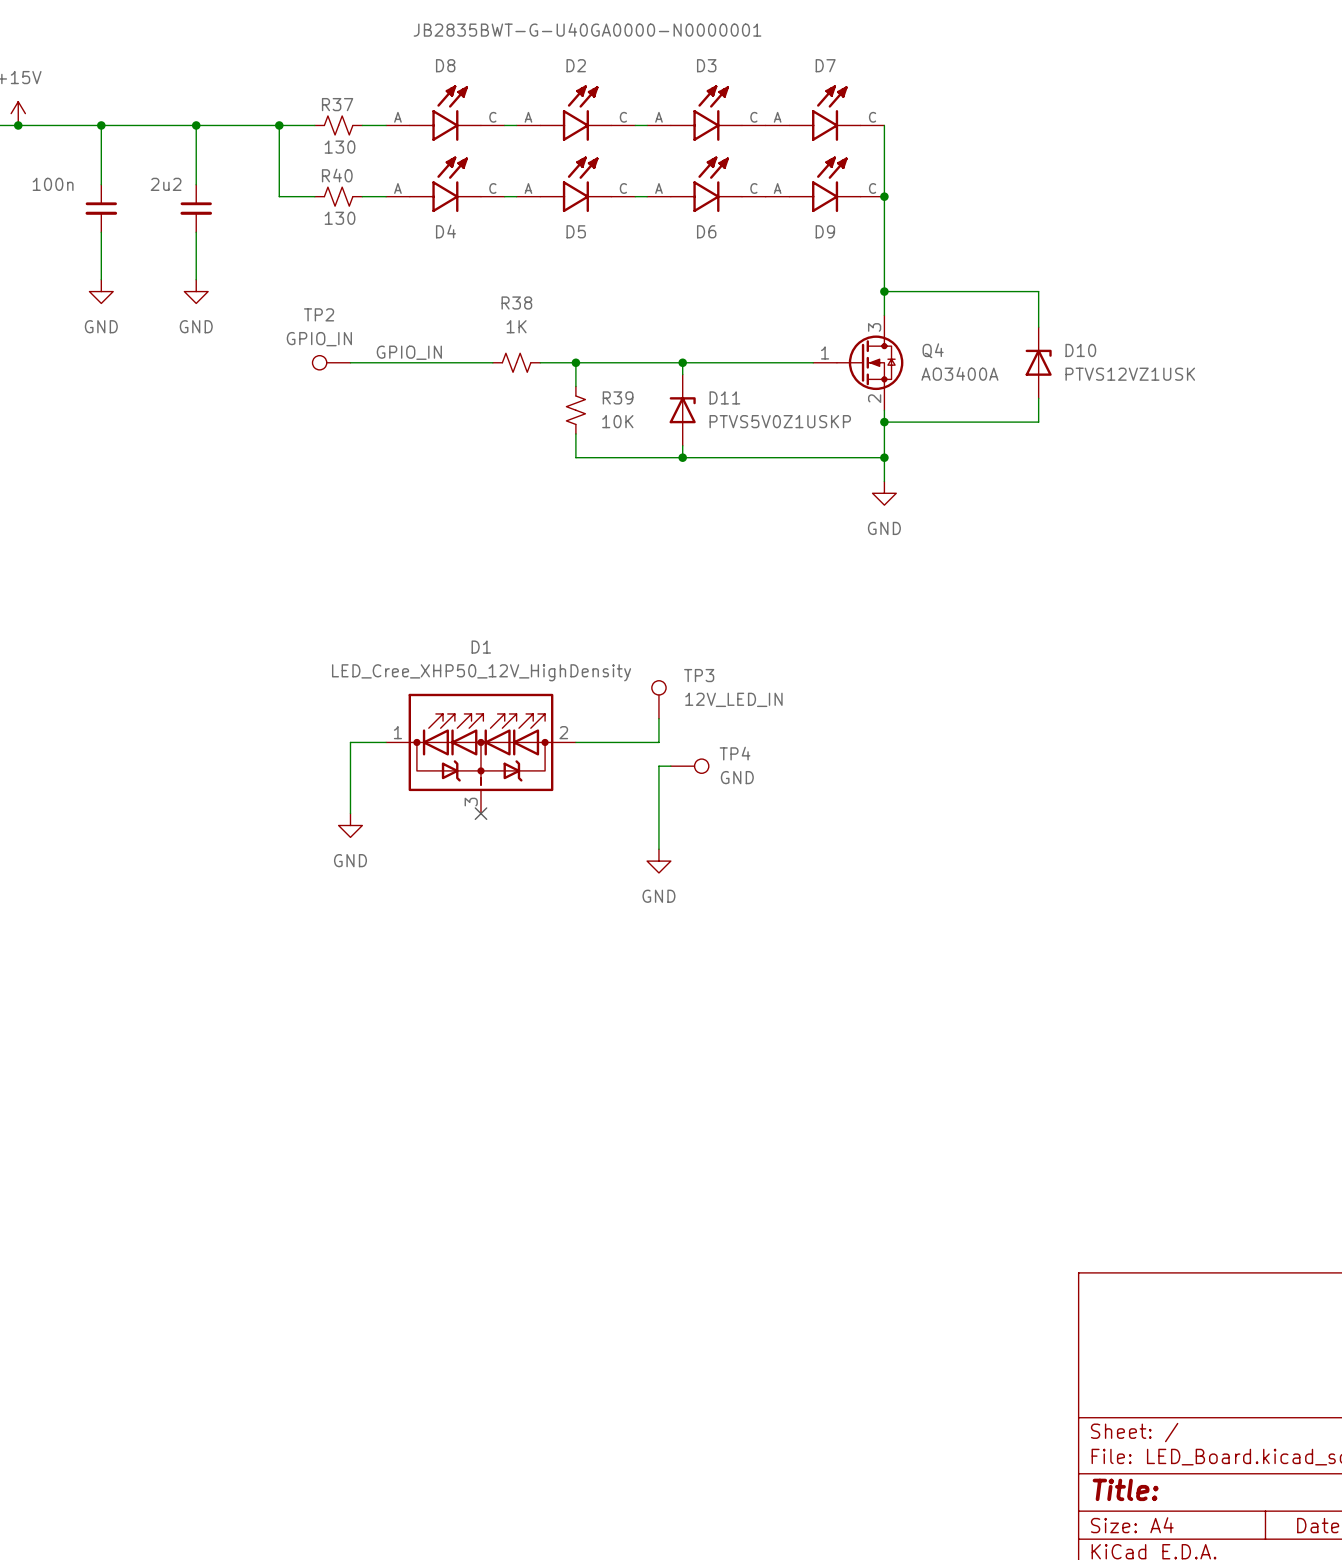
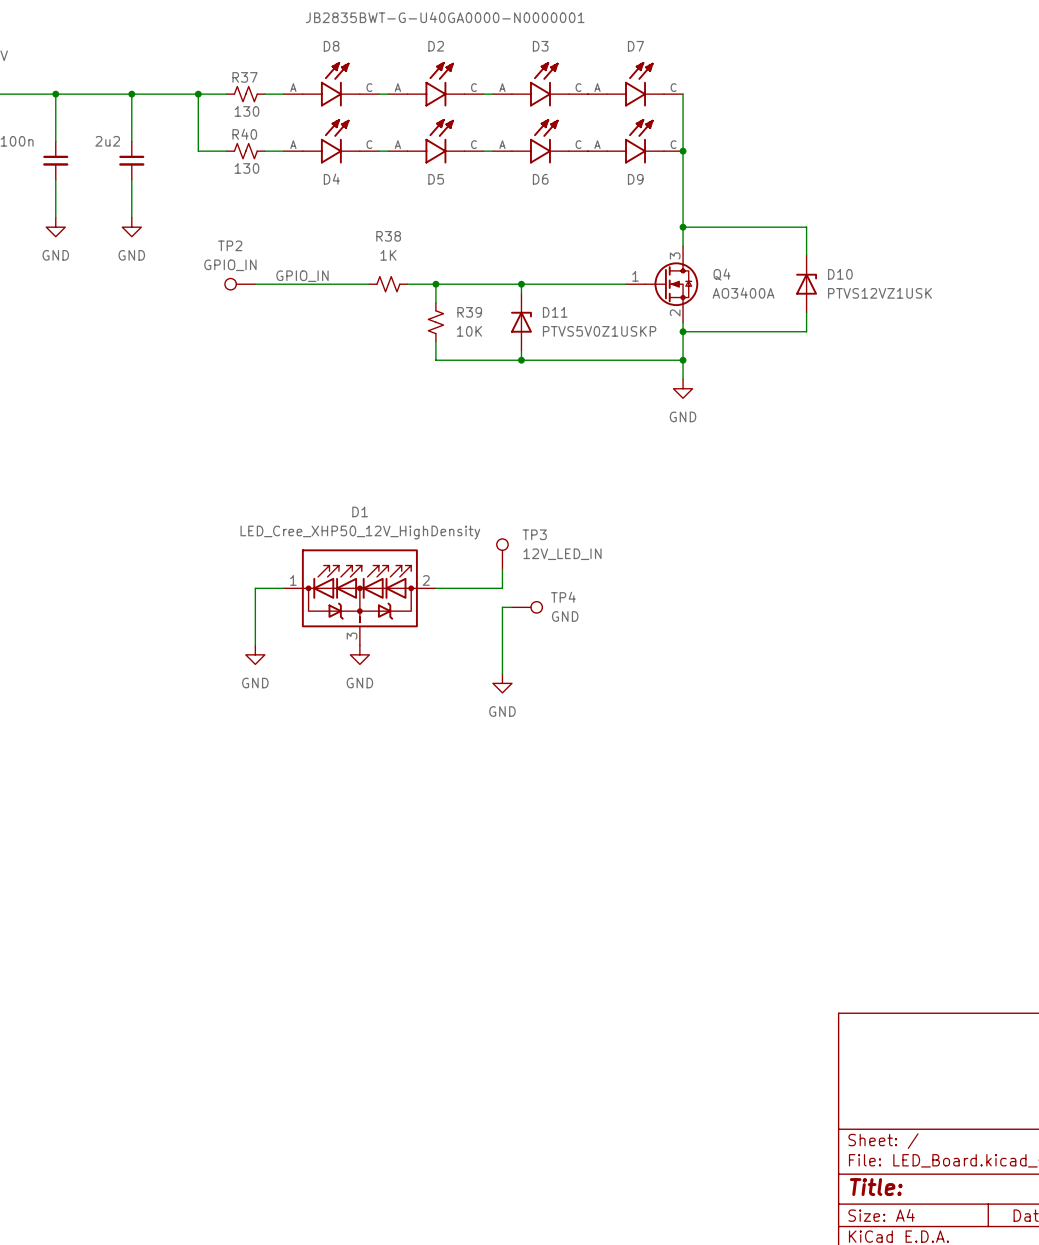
no-connect mark: (480, 813) -> none
power symbol: none -> GND (359, 654)

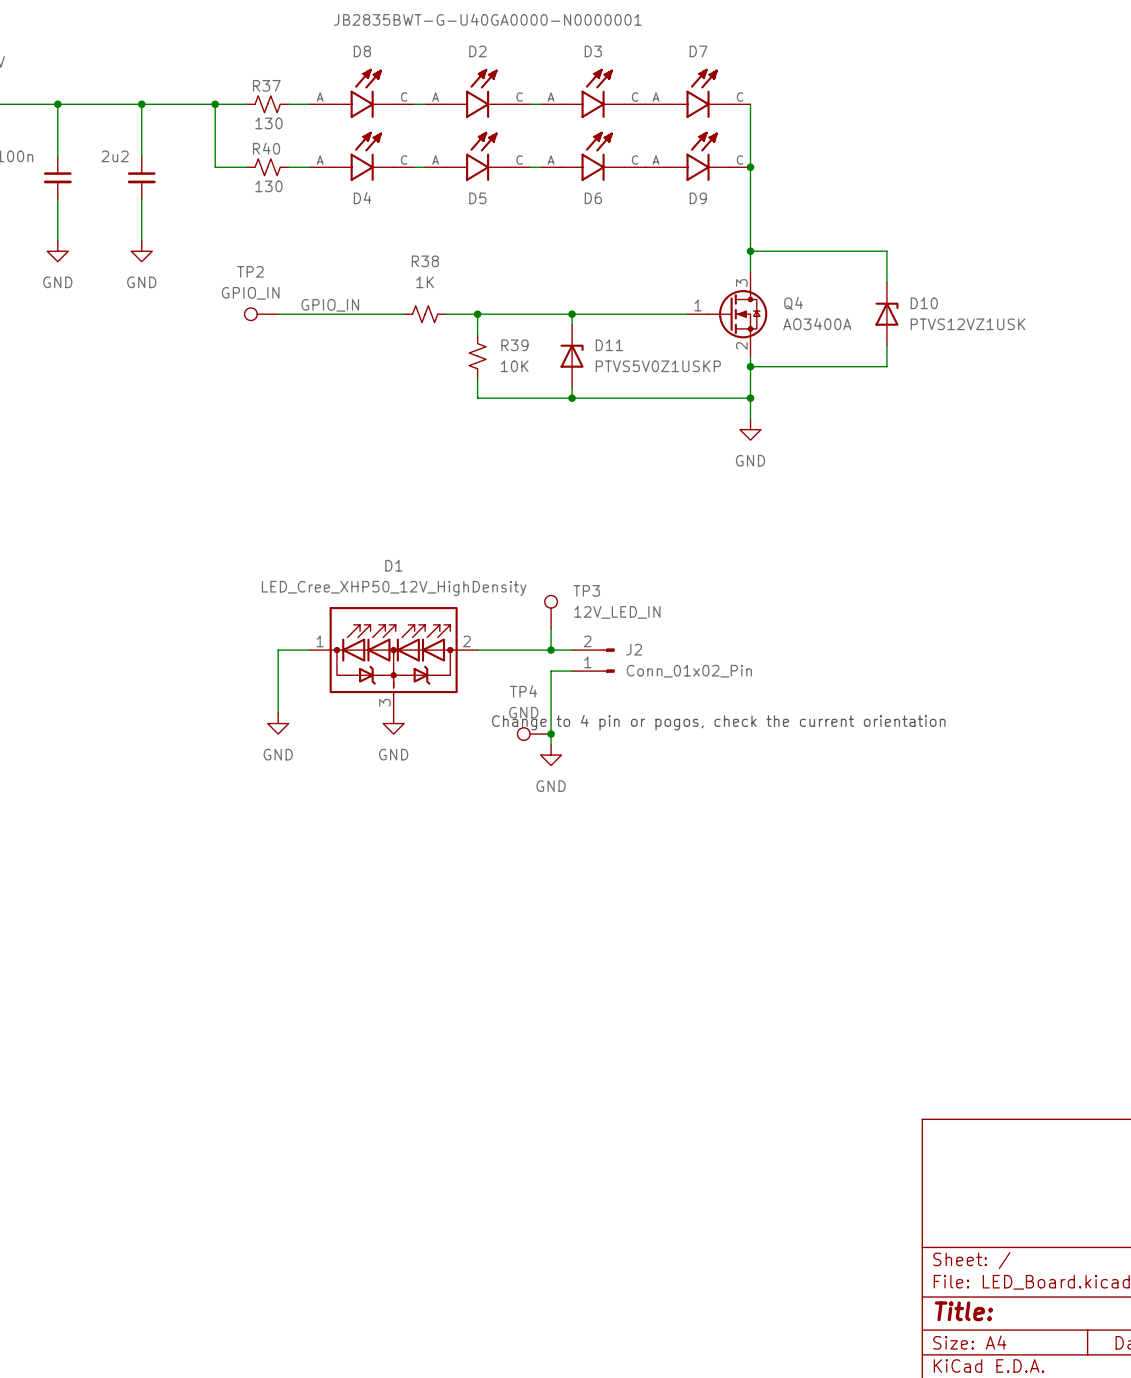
wire: none -> (551, 650) (572, 650)
junction: none -> (551, 650)
J2: none -> Conn_01x02_Pin (593, 660)
TP4 name position: TP4 (563, 597) -> TP4 (523, 691)
TP4 position: (527, 607) -> (534, 734)
TP4 rotation: 0° (536, 607) -> 180° (523, 734)
TP4 value position: GND (565, 616) -> GND (523, 712)
text: none -> Change to 4 pin or pogos, check the current orientation (718, 722)
junction: none -> (551, 734)

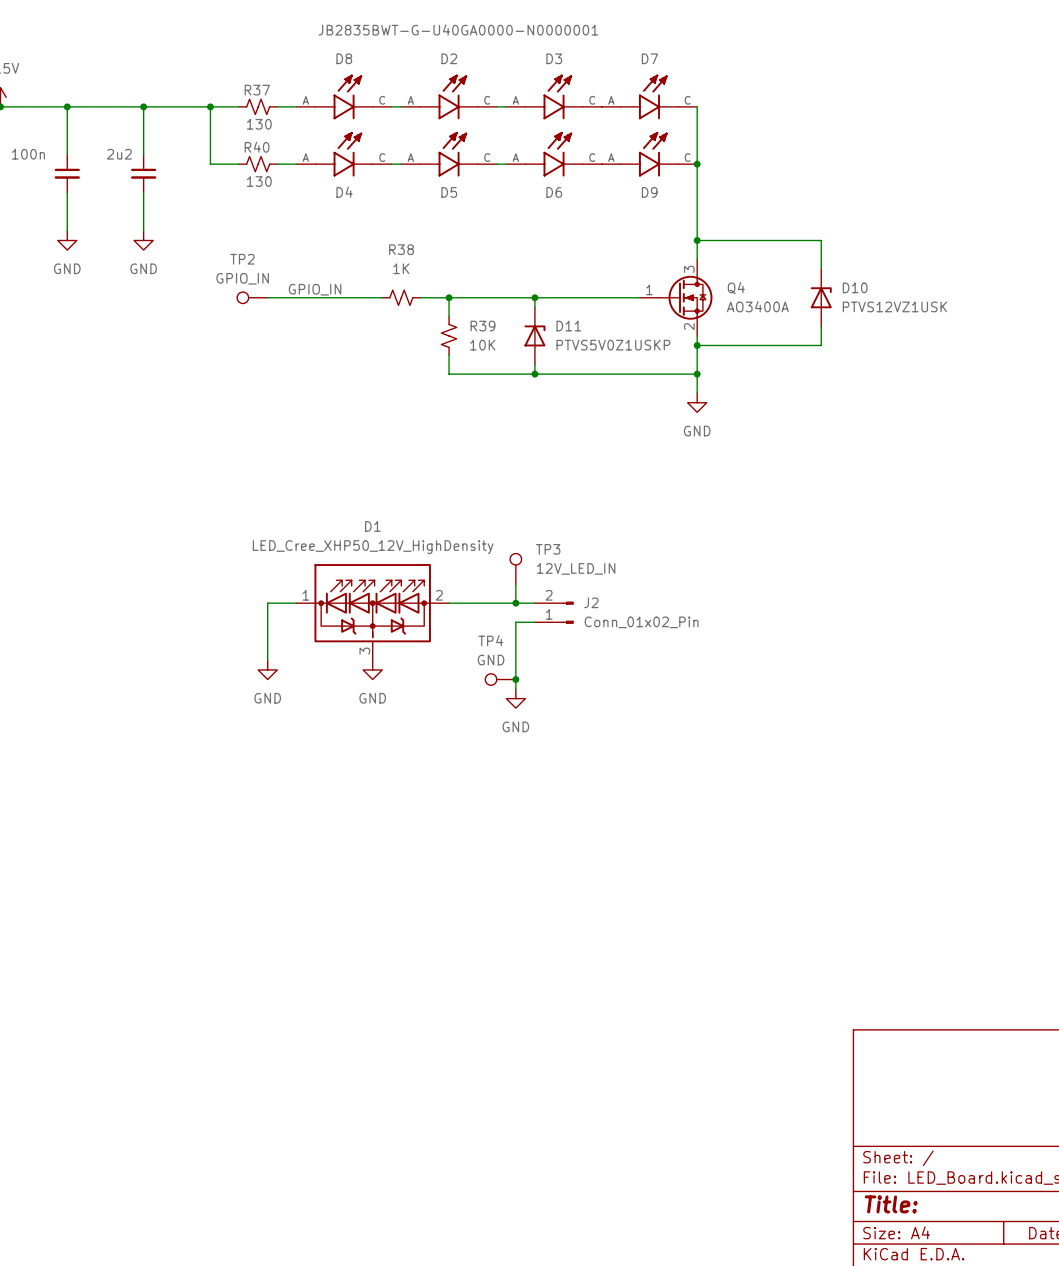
text: Change to 4 pin or pogos, check the current orientation (718, 722) -> none

